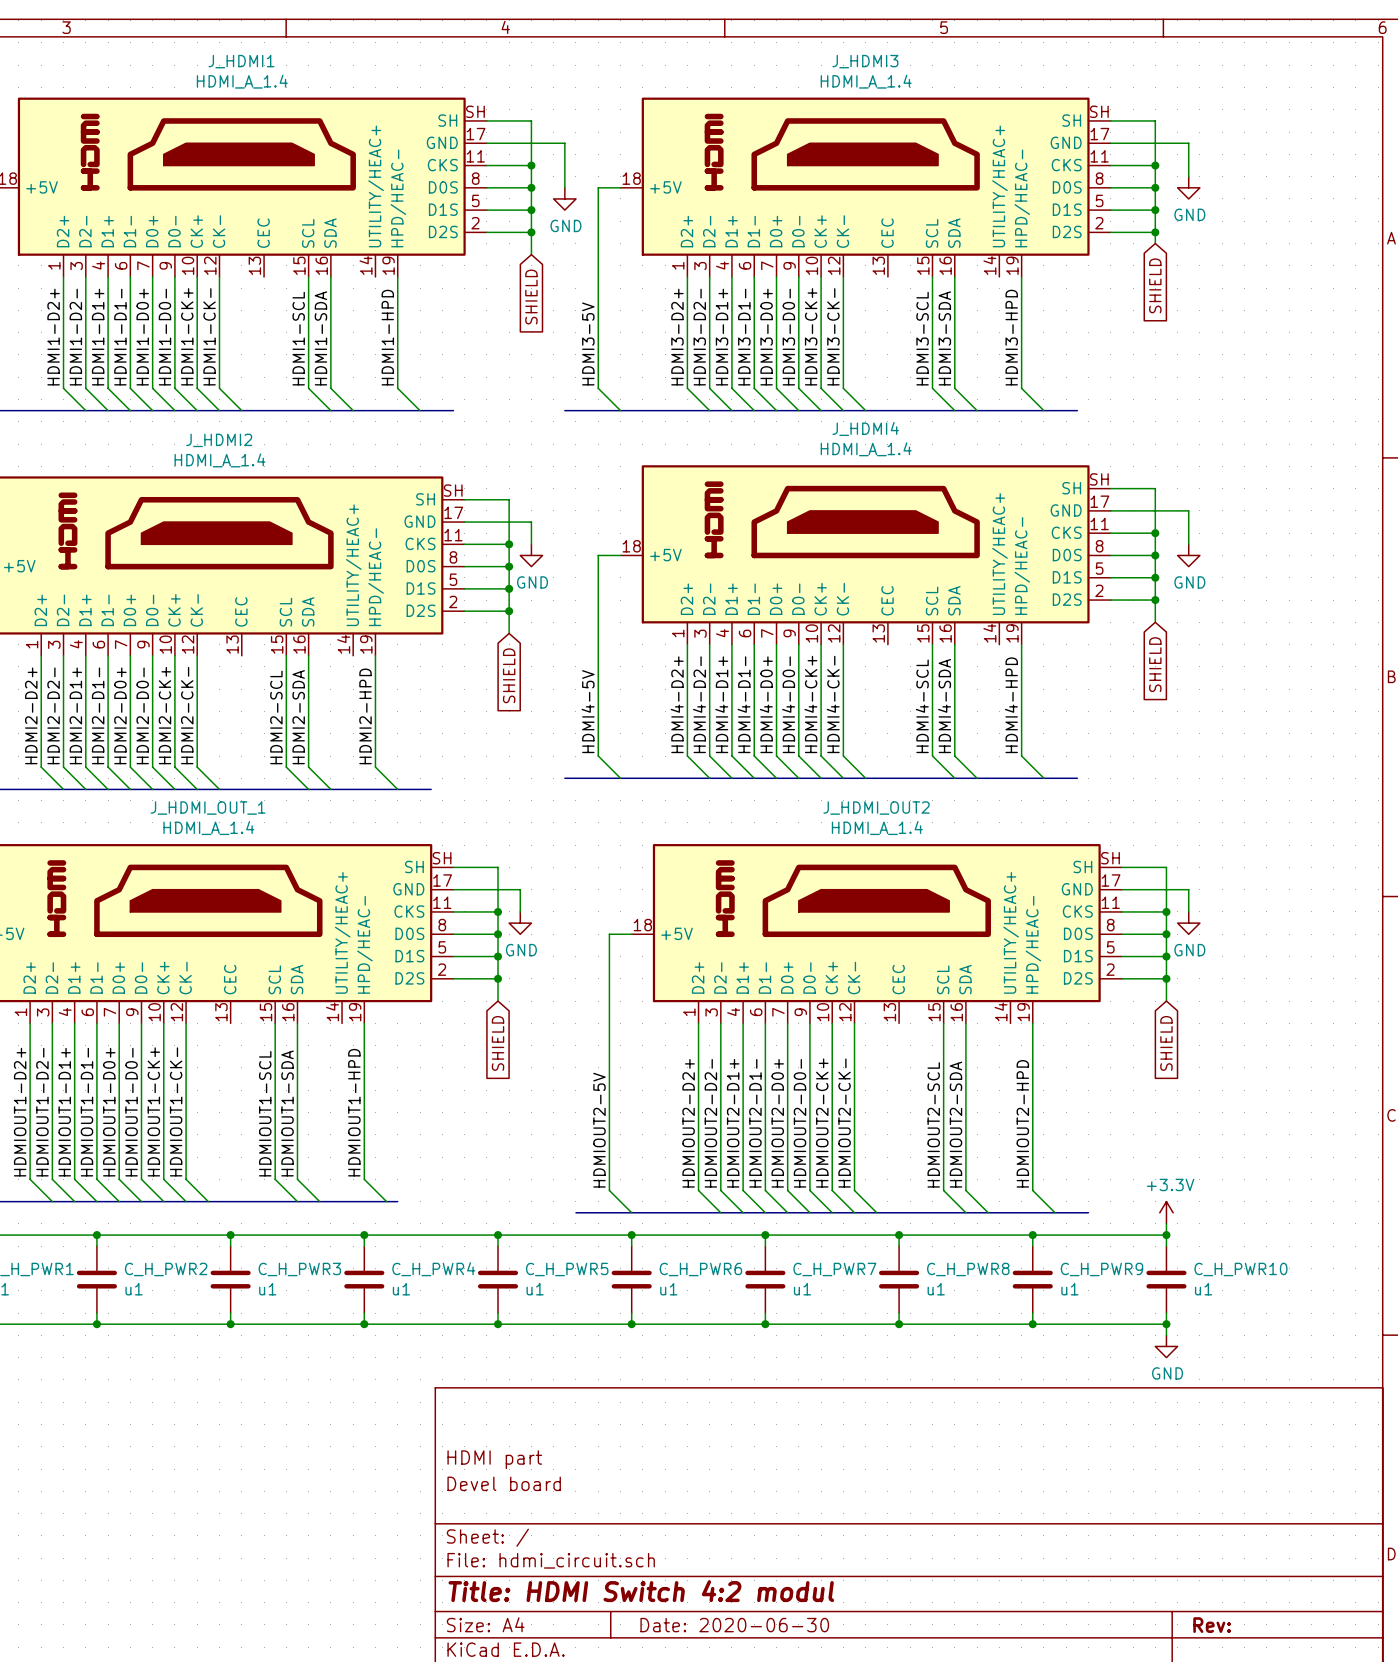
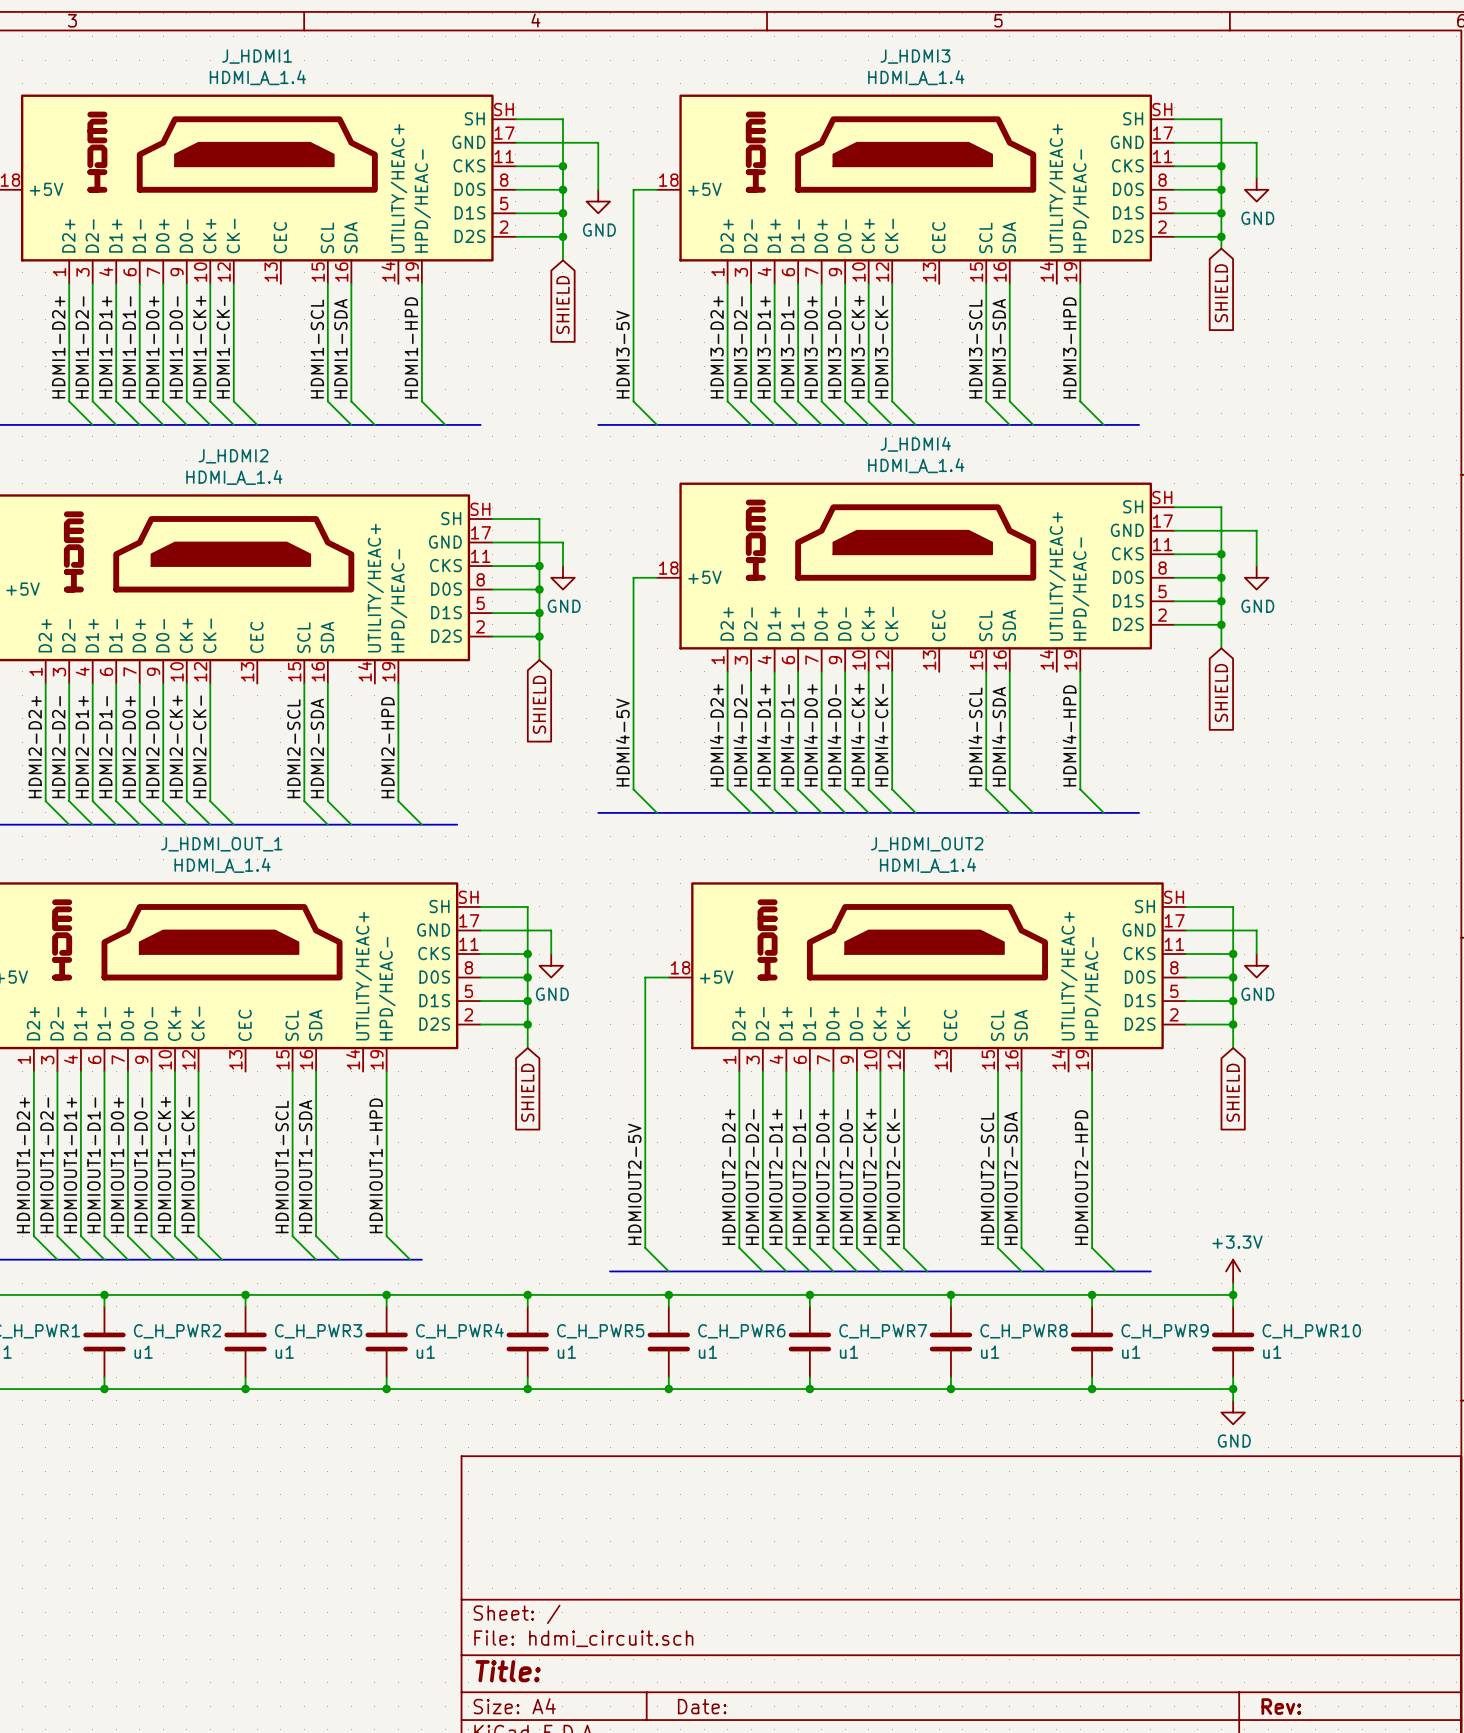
title block: HDMI part (494, 1459) -> none
title block: Devel board (504, 1483) -> none
title block: Title: HDMI Switch 4:2 modul (641, 1591) -> Title: (508, 1671)
title block: Date: 2020-06-30 (734, 1625) -> Date: (702, 1706)

